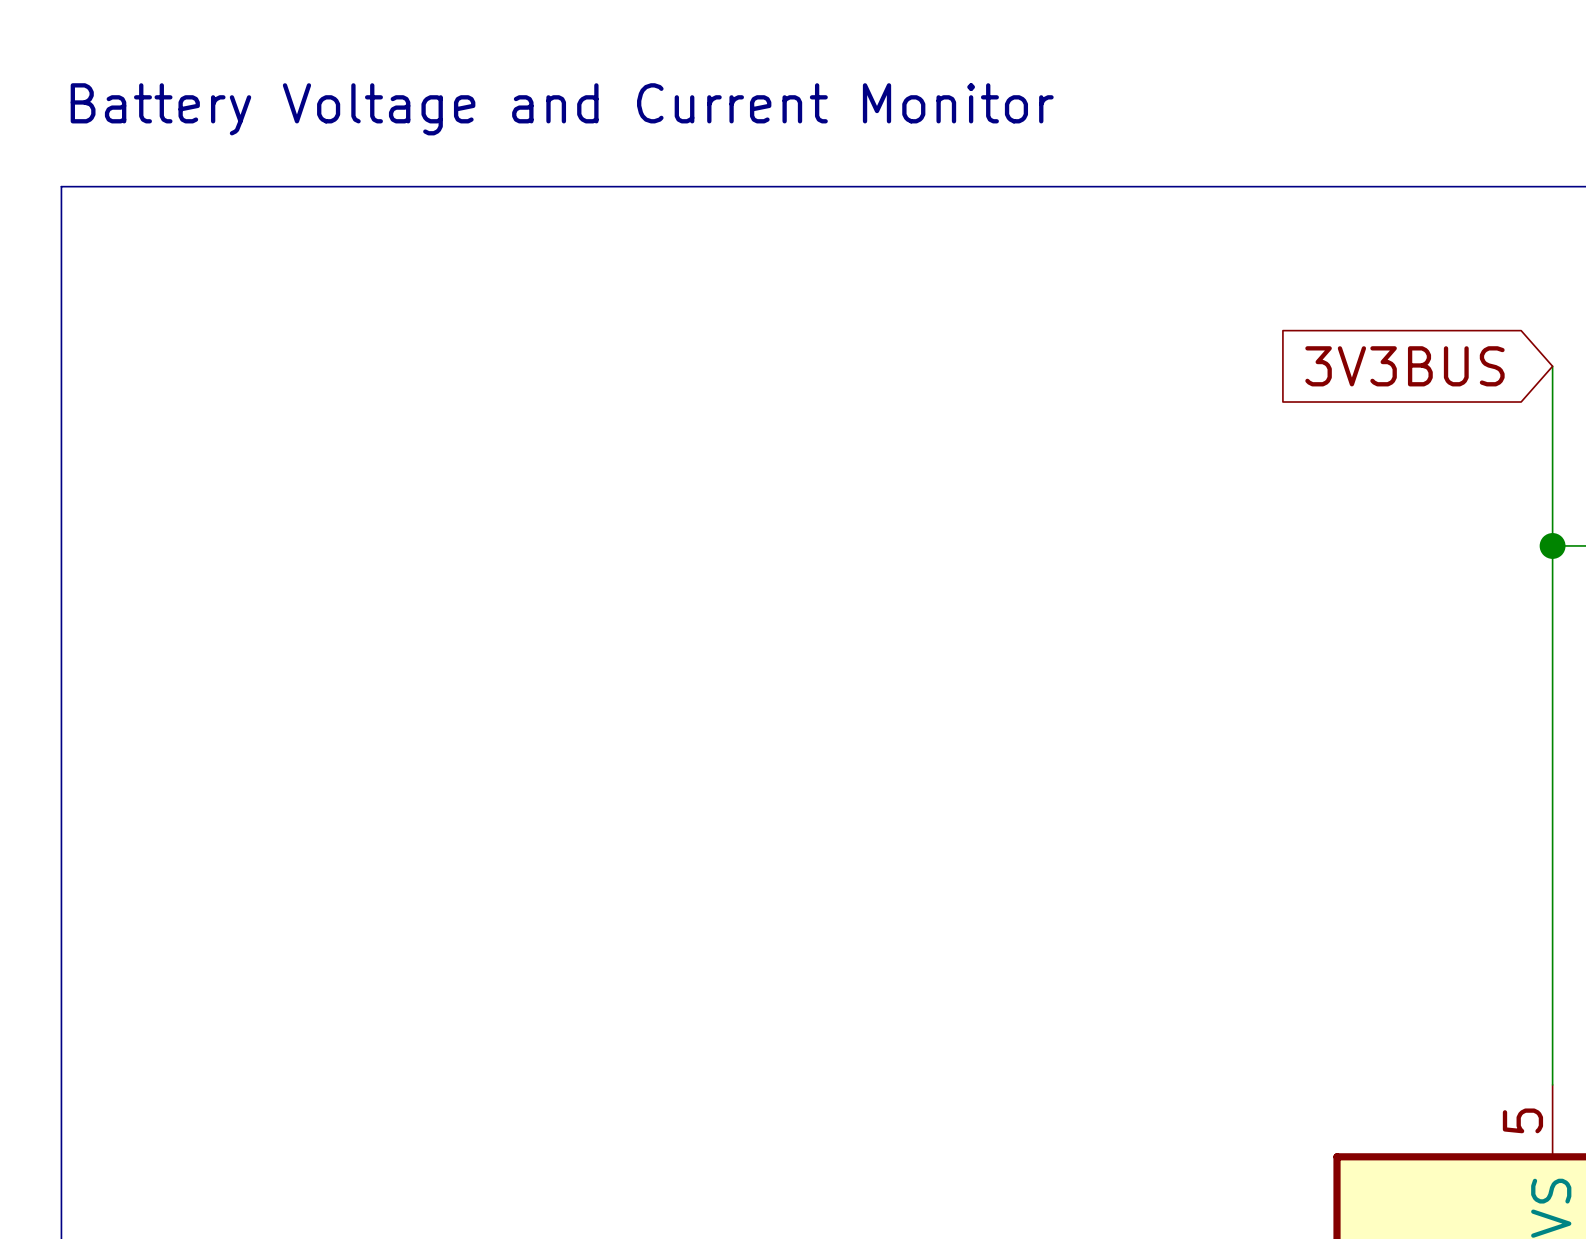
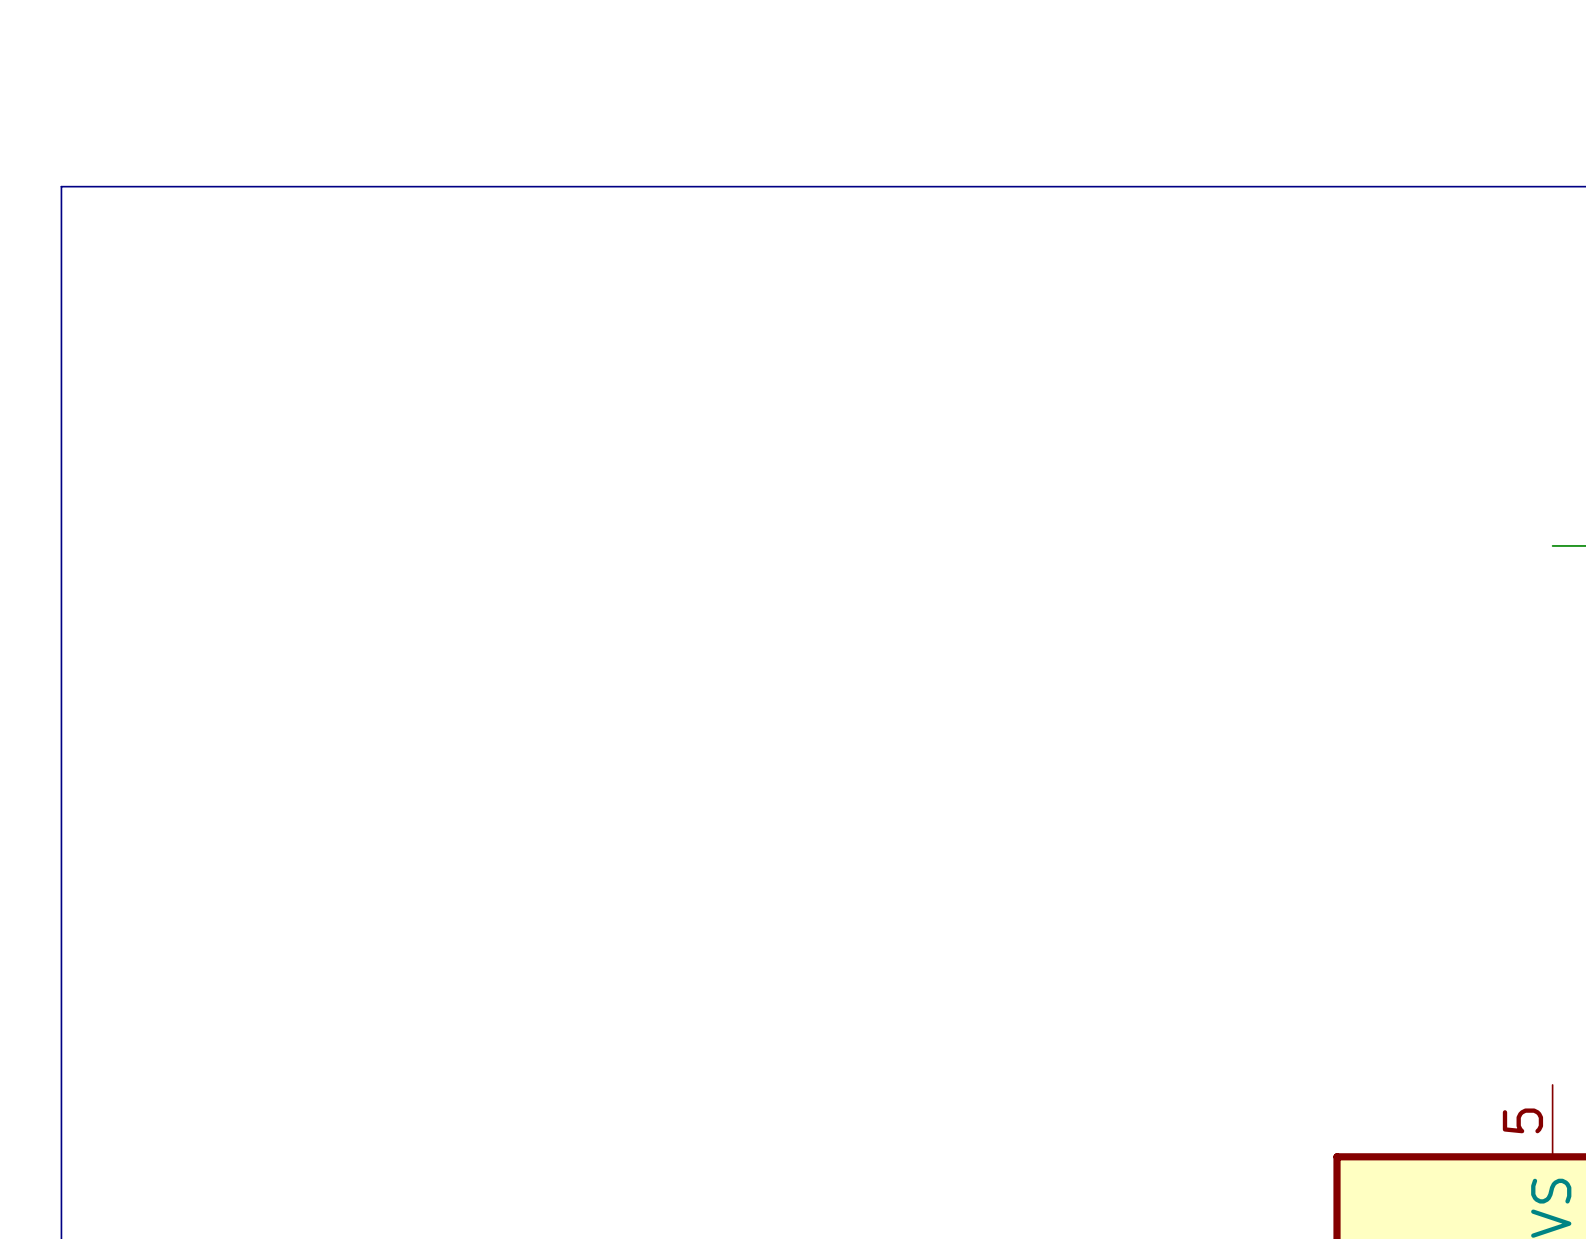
text: Battery Voltage and Current Monitor (562, 109) -> none
global label: 3V3BUS (1404, 366) -> none
wire: (1552, 366) (1552, 1084) -> none
junction: (1552, 545) -> none

